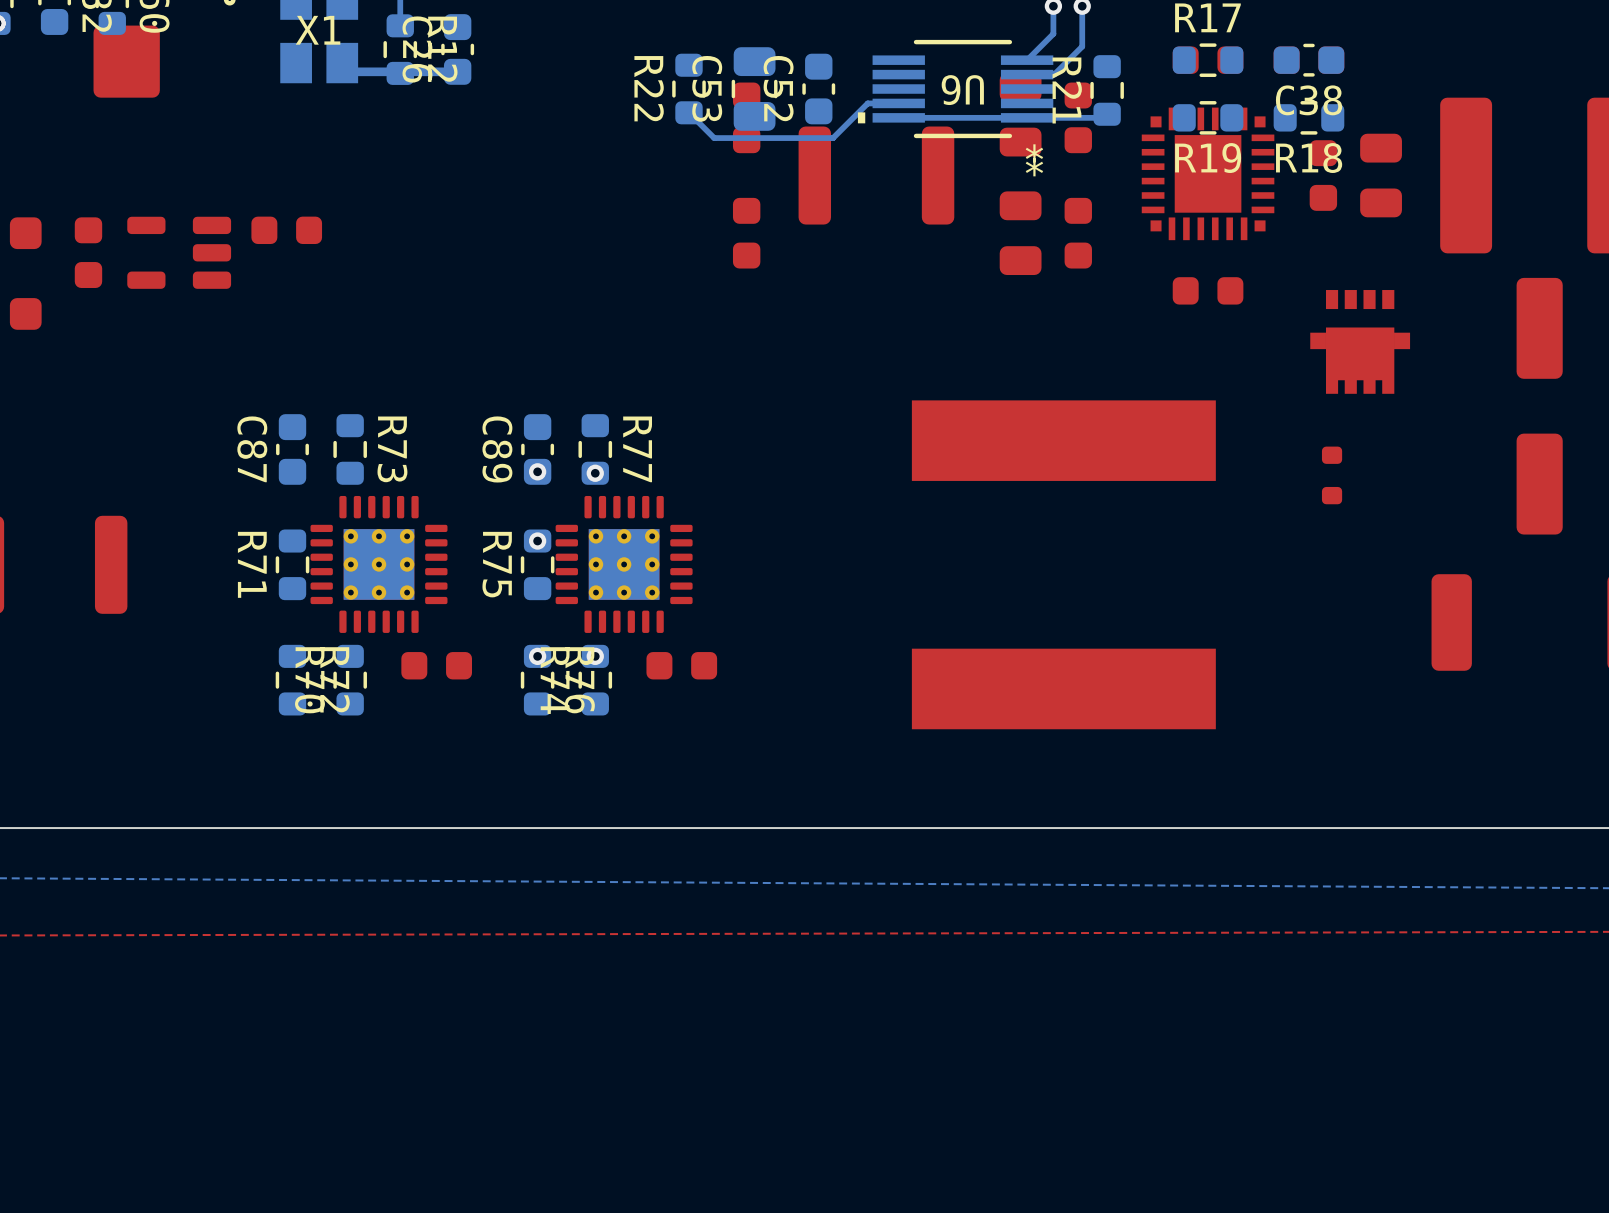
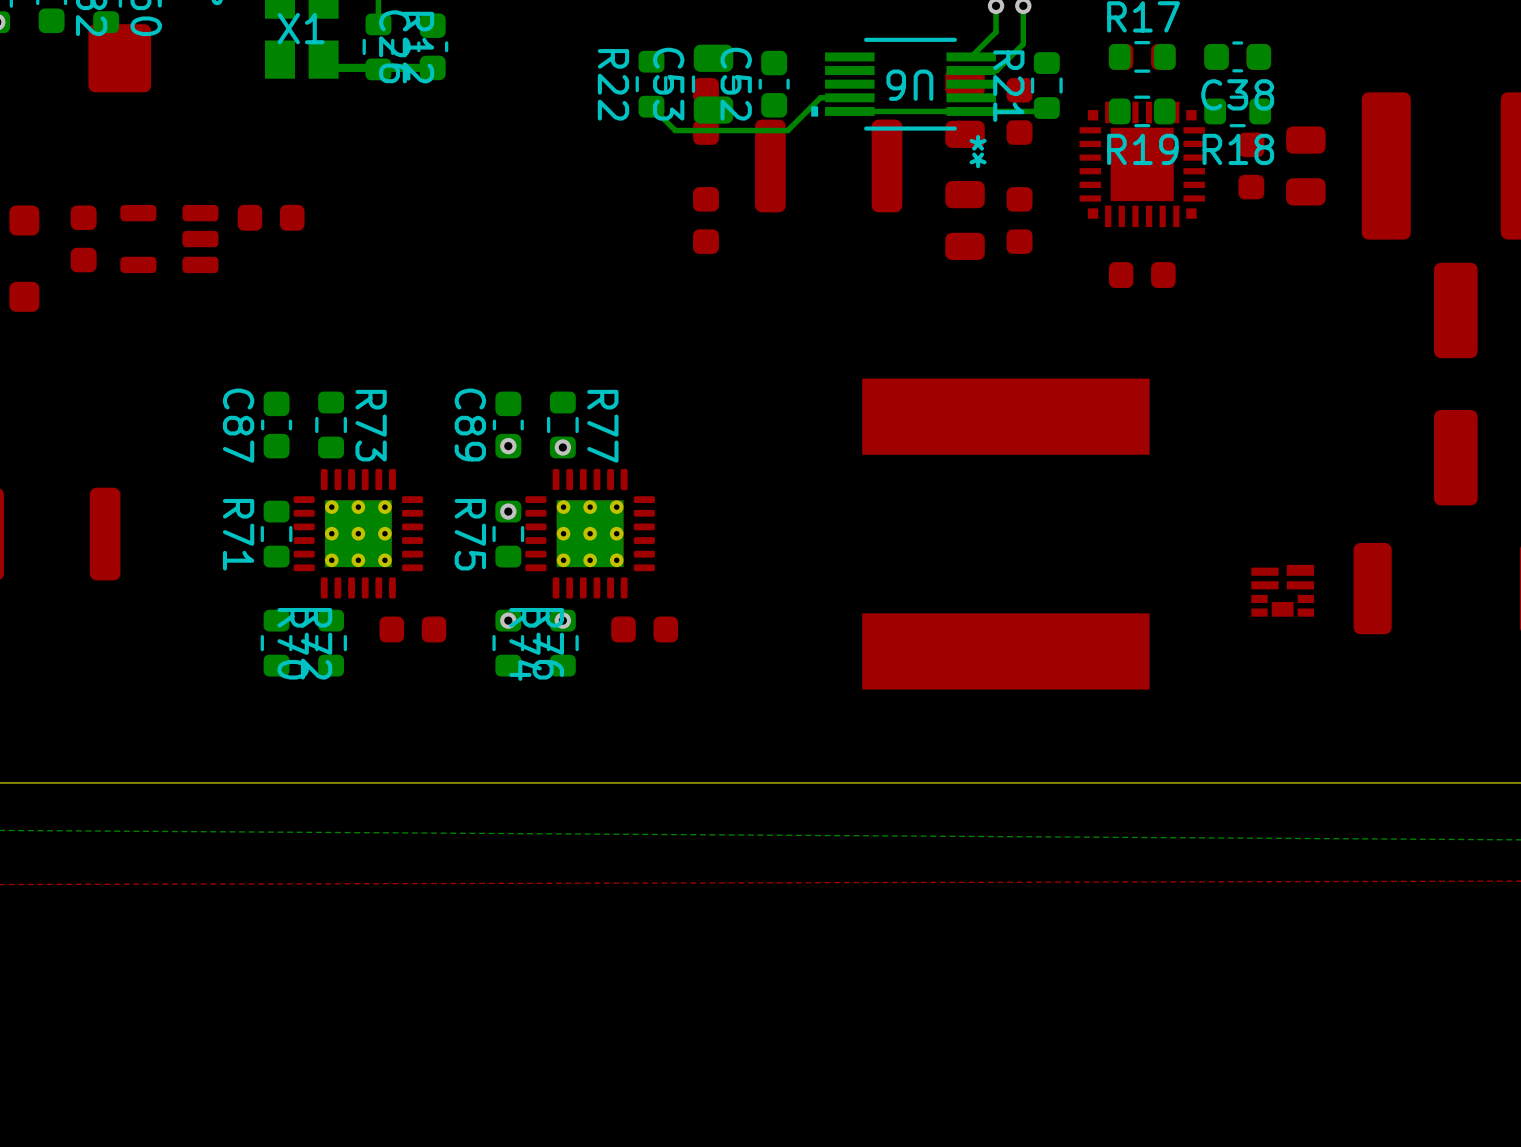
part: (1360, 341) -> none
part: (1332, 475) -> none
part: none -> (1282, 590)

